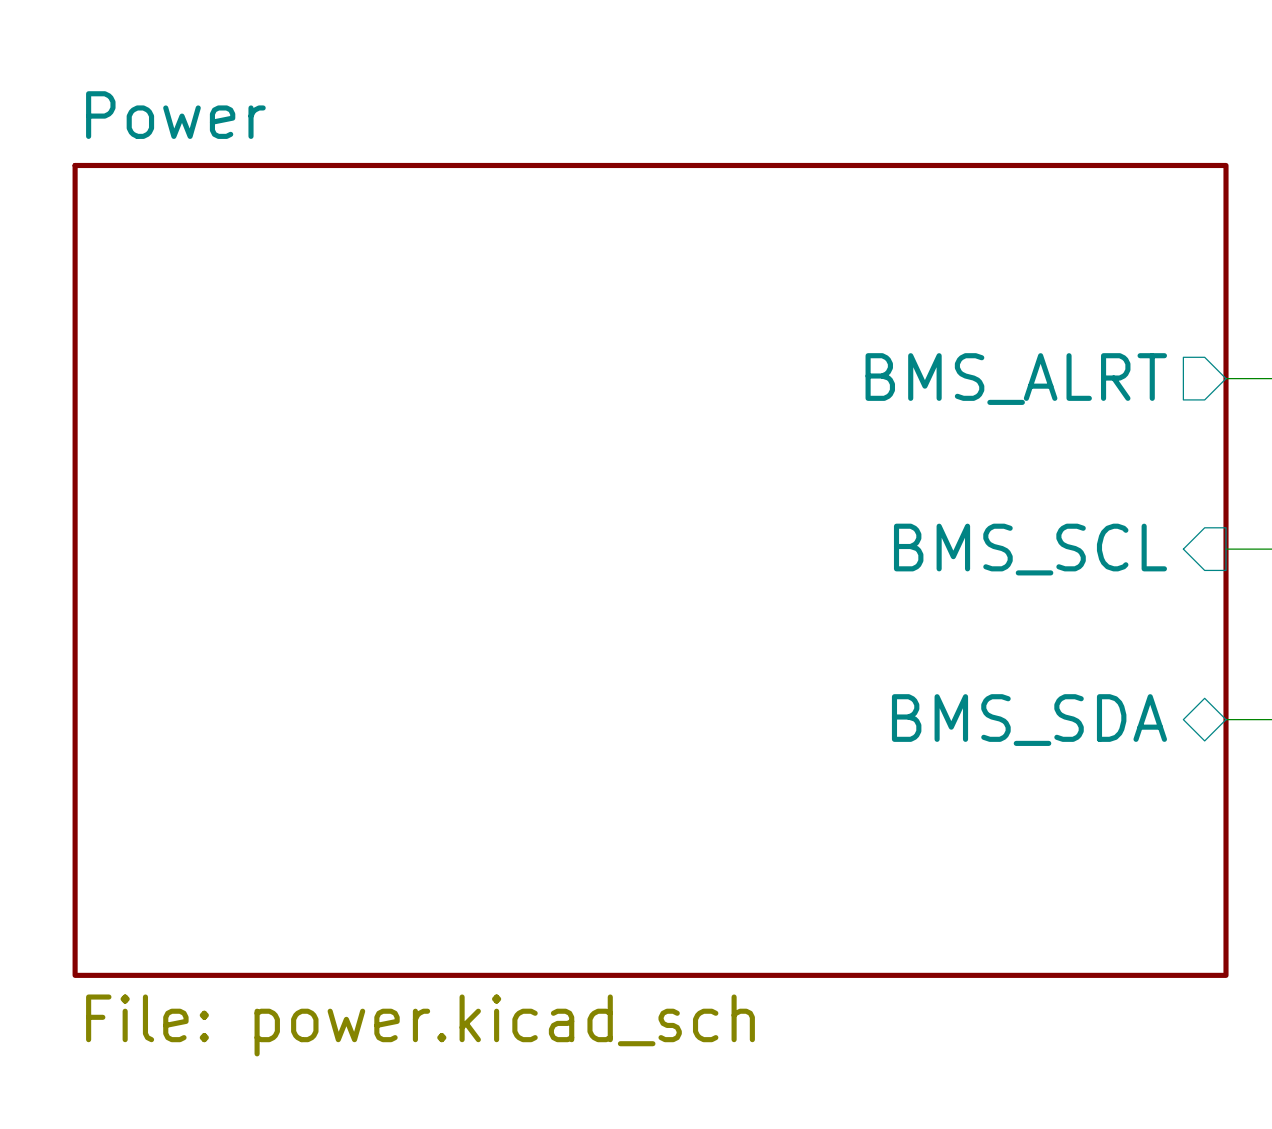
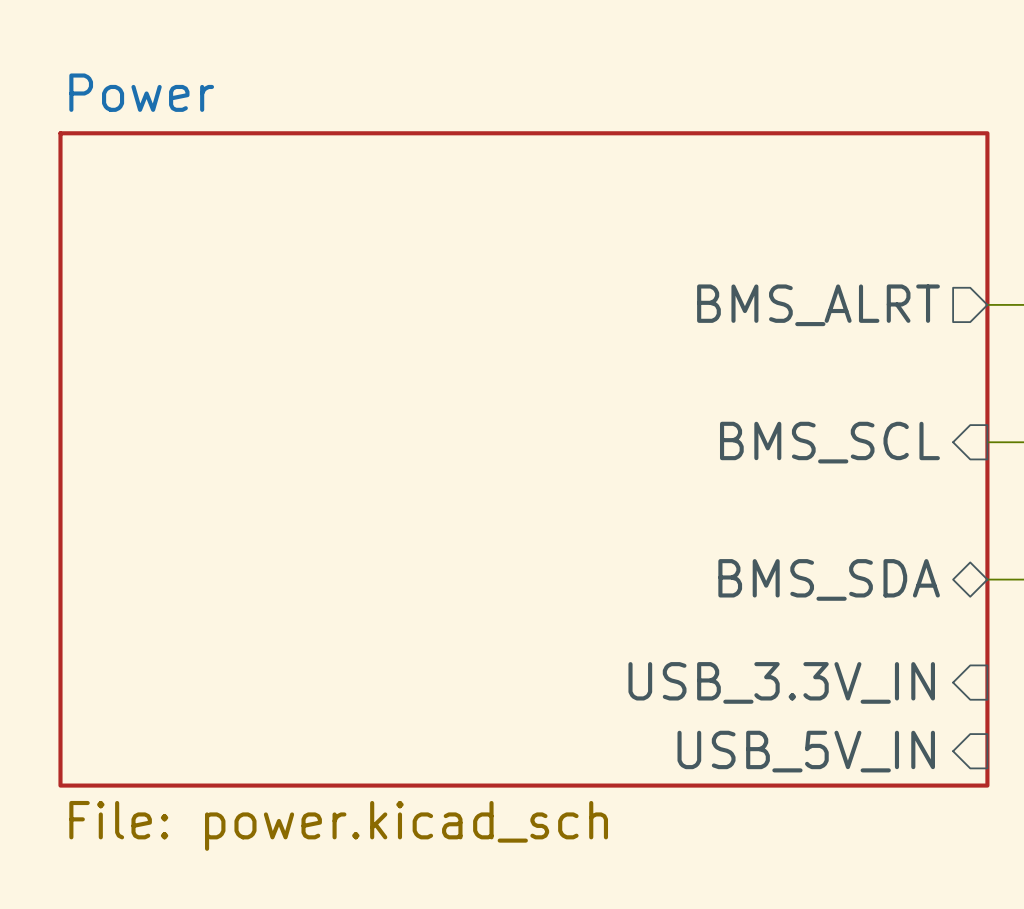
sheet pin: none -> USB_3.3V_IN (781, 682)
sheet pin: none -> USB_5V_IN (806, 751)

